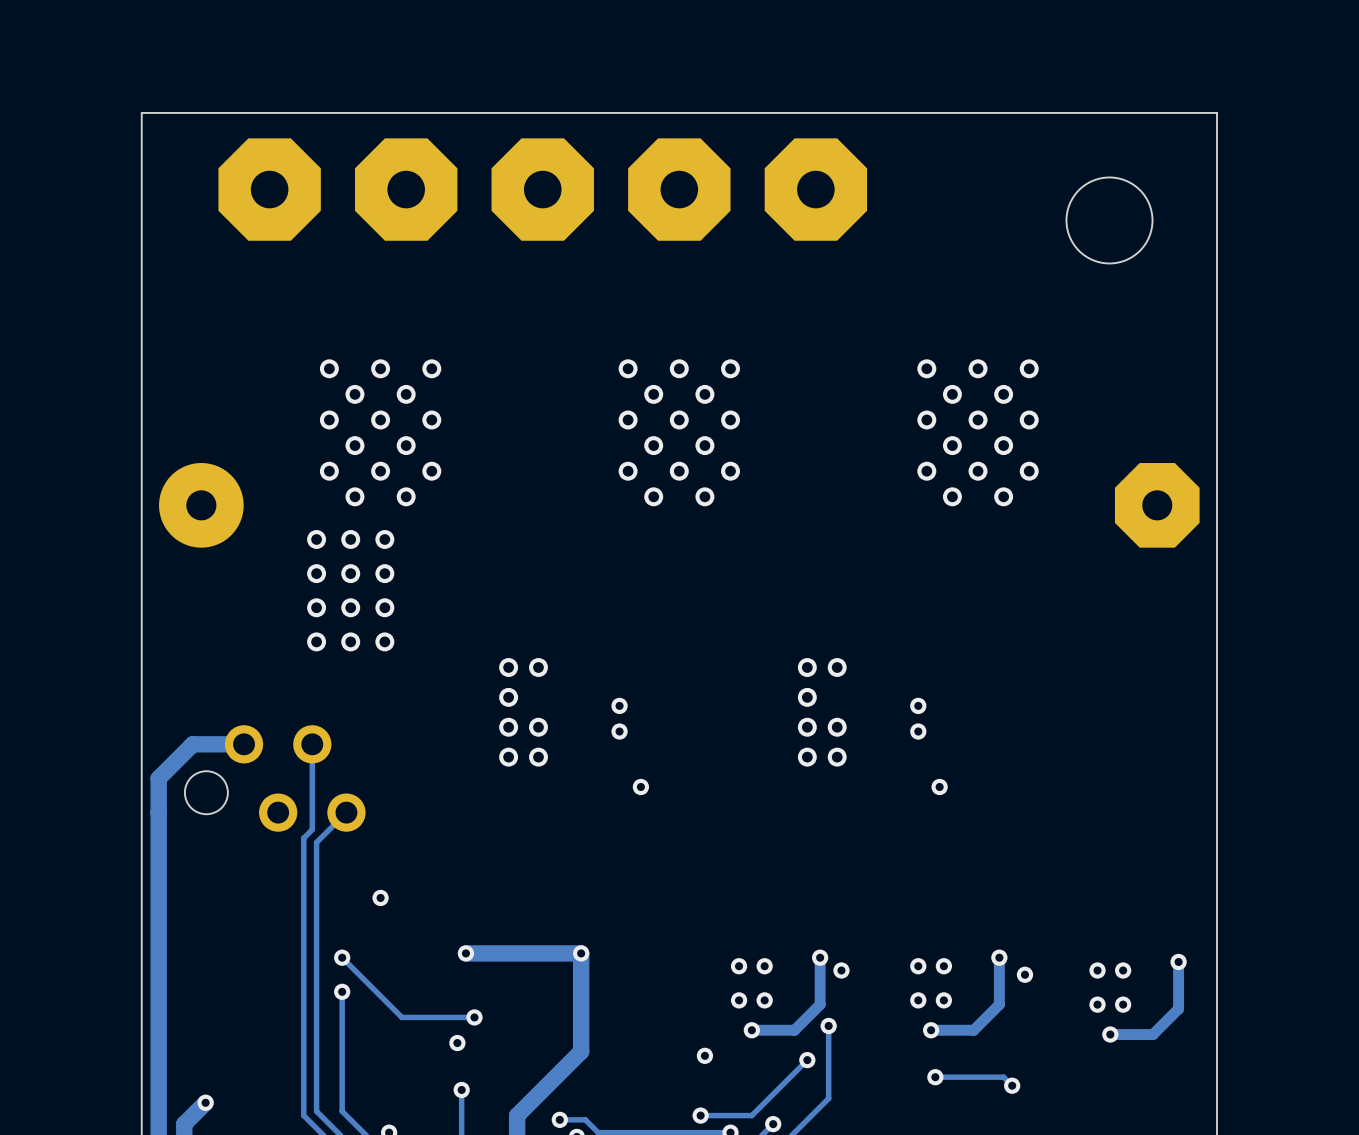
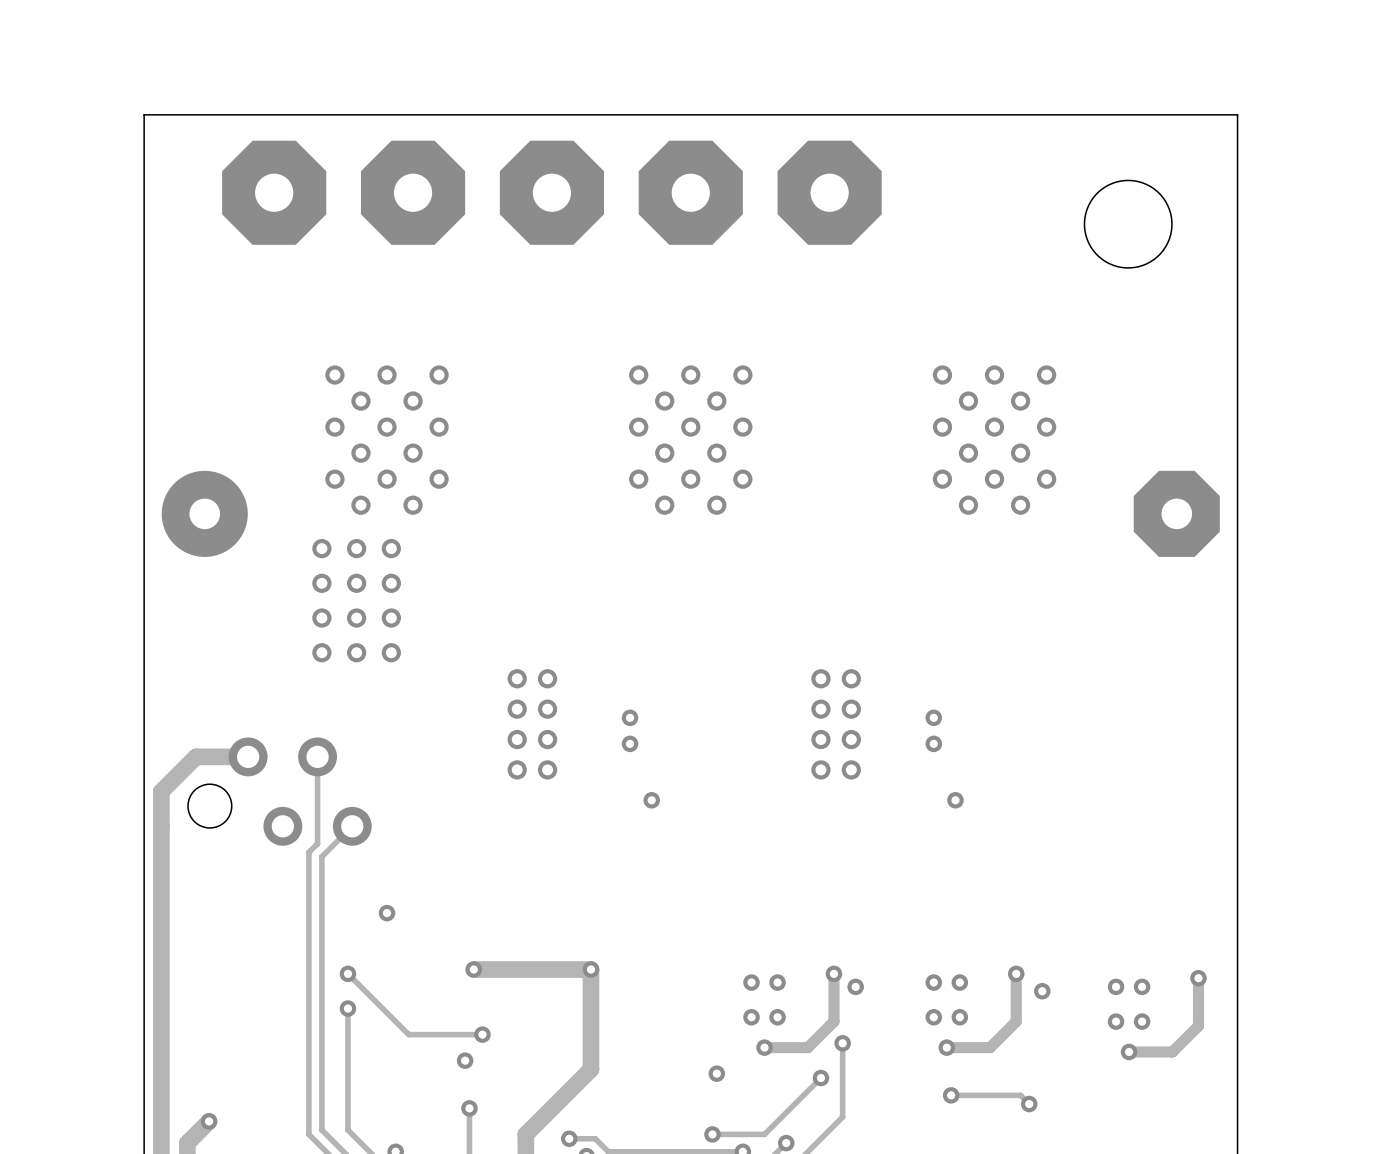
via: none -> (547, 709)
via: none -> (851, 709)

